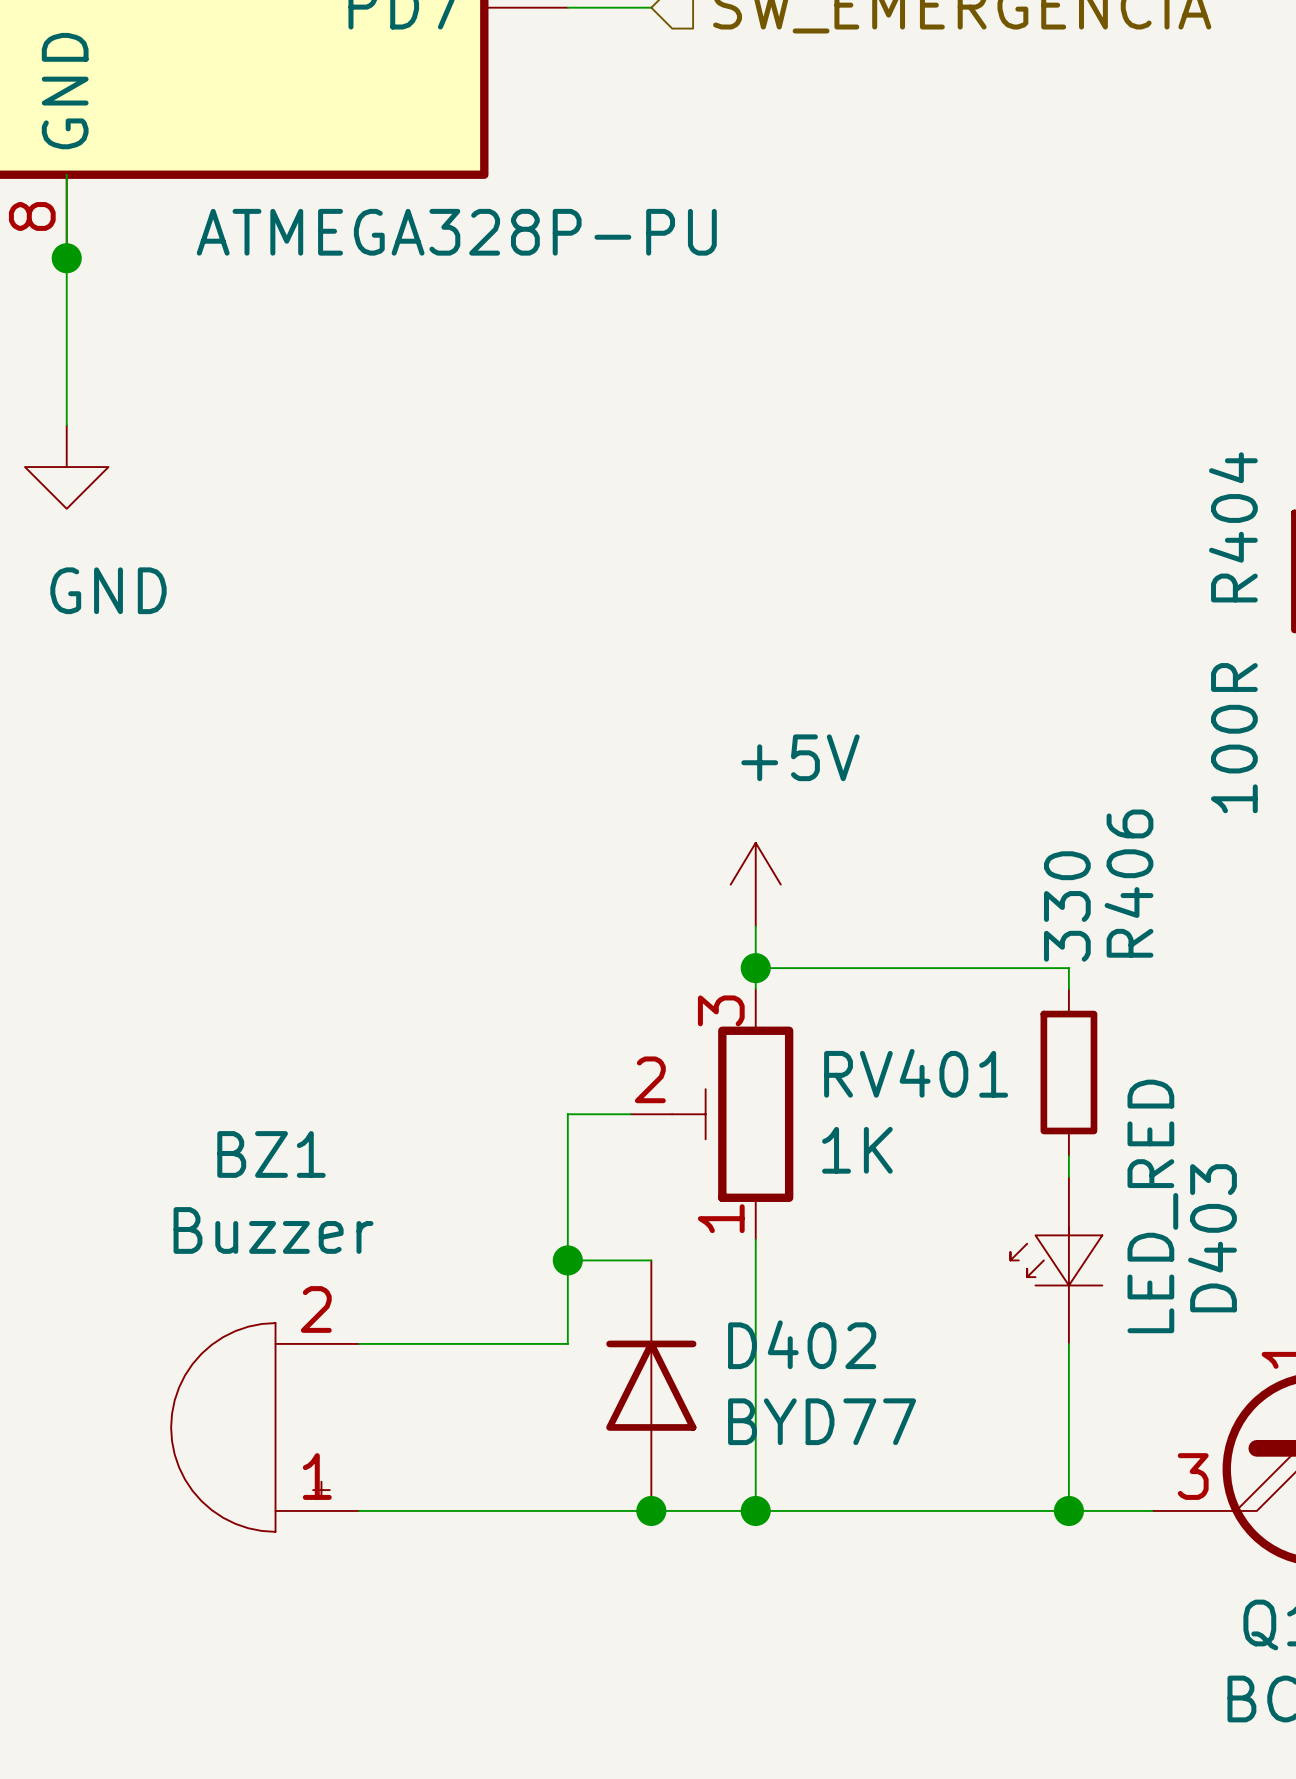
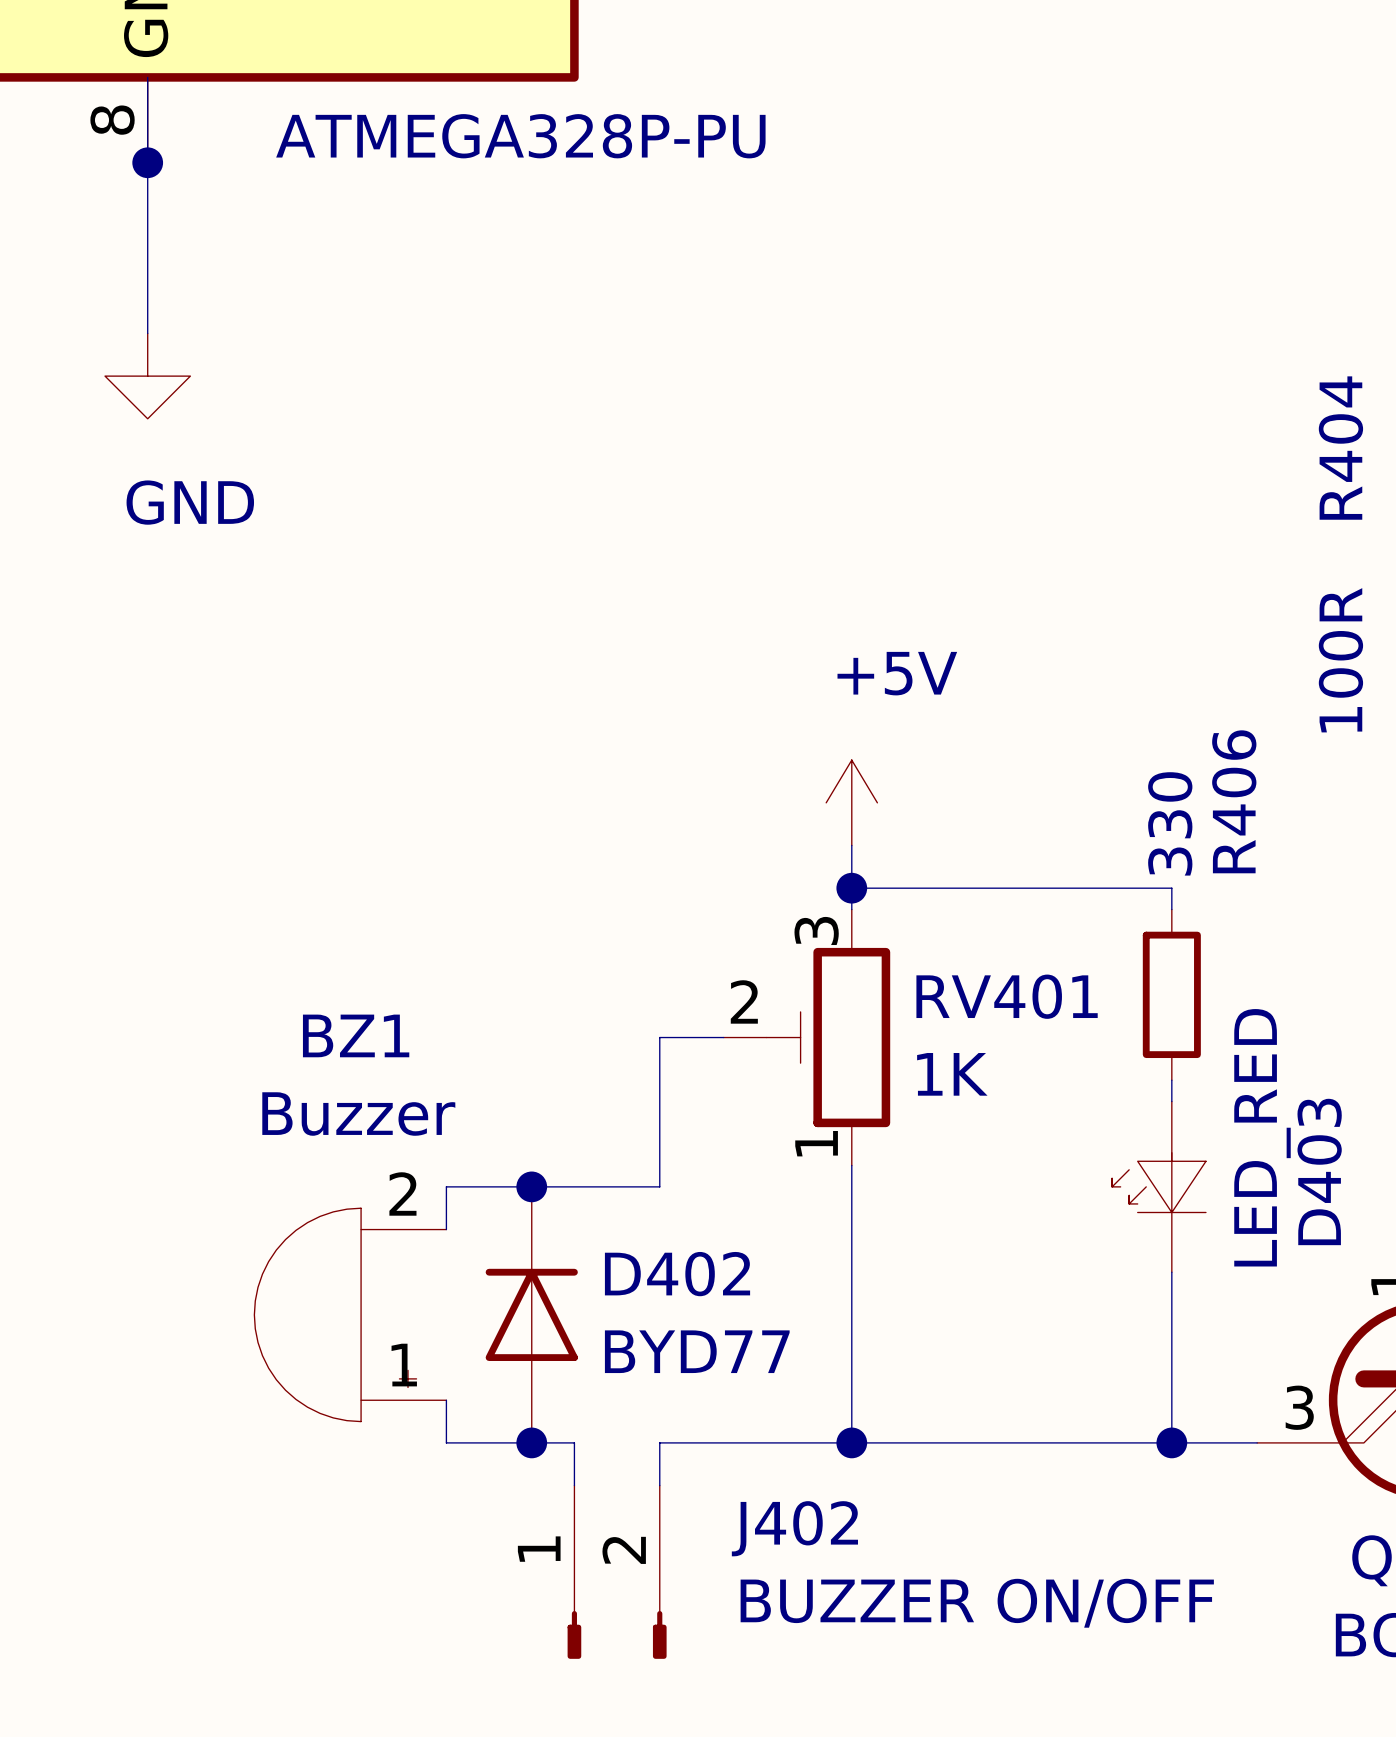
wire: none -> (659, 1186) (446, 1186) (446, 1229)
junction position: (567, 1260) -> (531, 1186)
wire: (651, 1260) (567, 1260) (567, 1343) (359, 1343) -> none
D402 position: (651, 1385) -> (531, 1314)
BZ1 position: (265, 1427) -> (350, 1314)
wire: none -> (446, 1400) (446, 1442)
junction: none -> (531, 1442)
wire: (484, 1510) (567, 1510) -> (574, 1442) (574, 1485)
wire: none -> (659, 1442) (659, 1485)
junction: (651, 1510) -> none
J402: none -> BUZZER ON/OFF (617, 1572)

